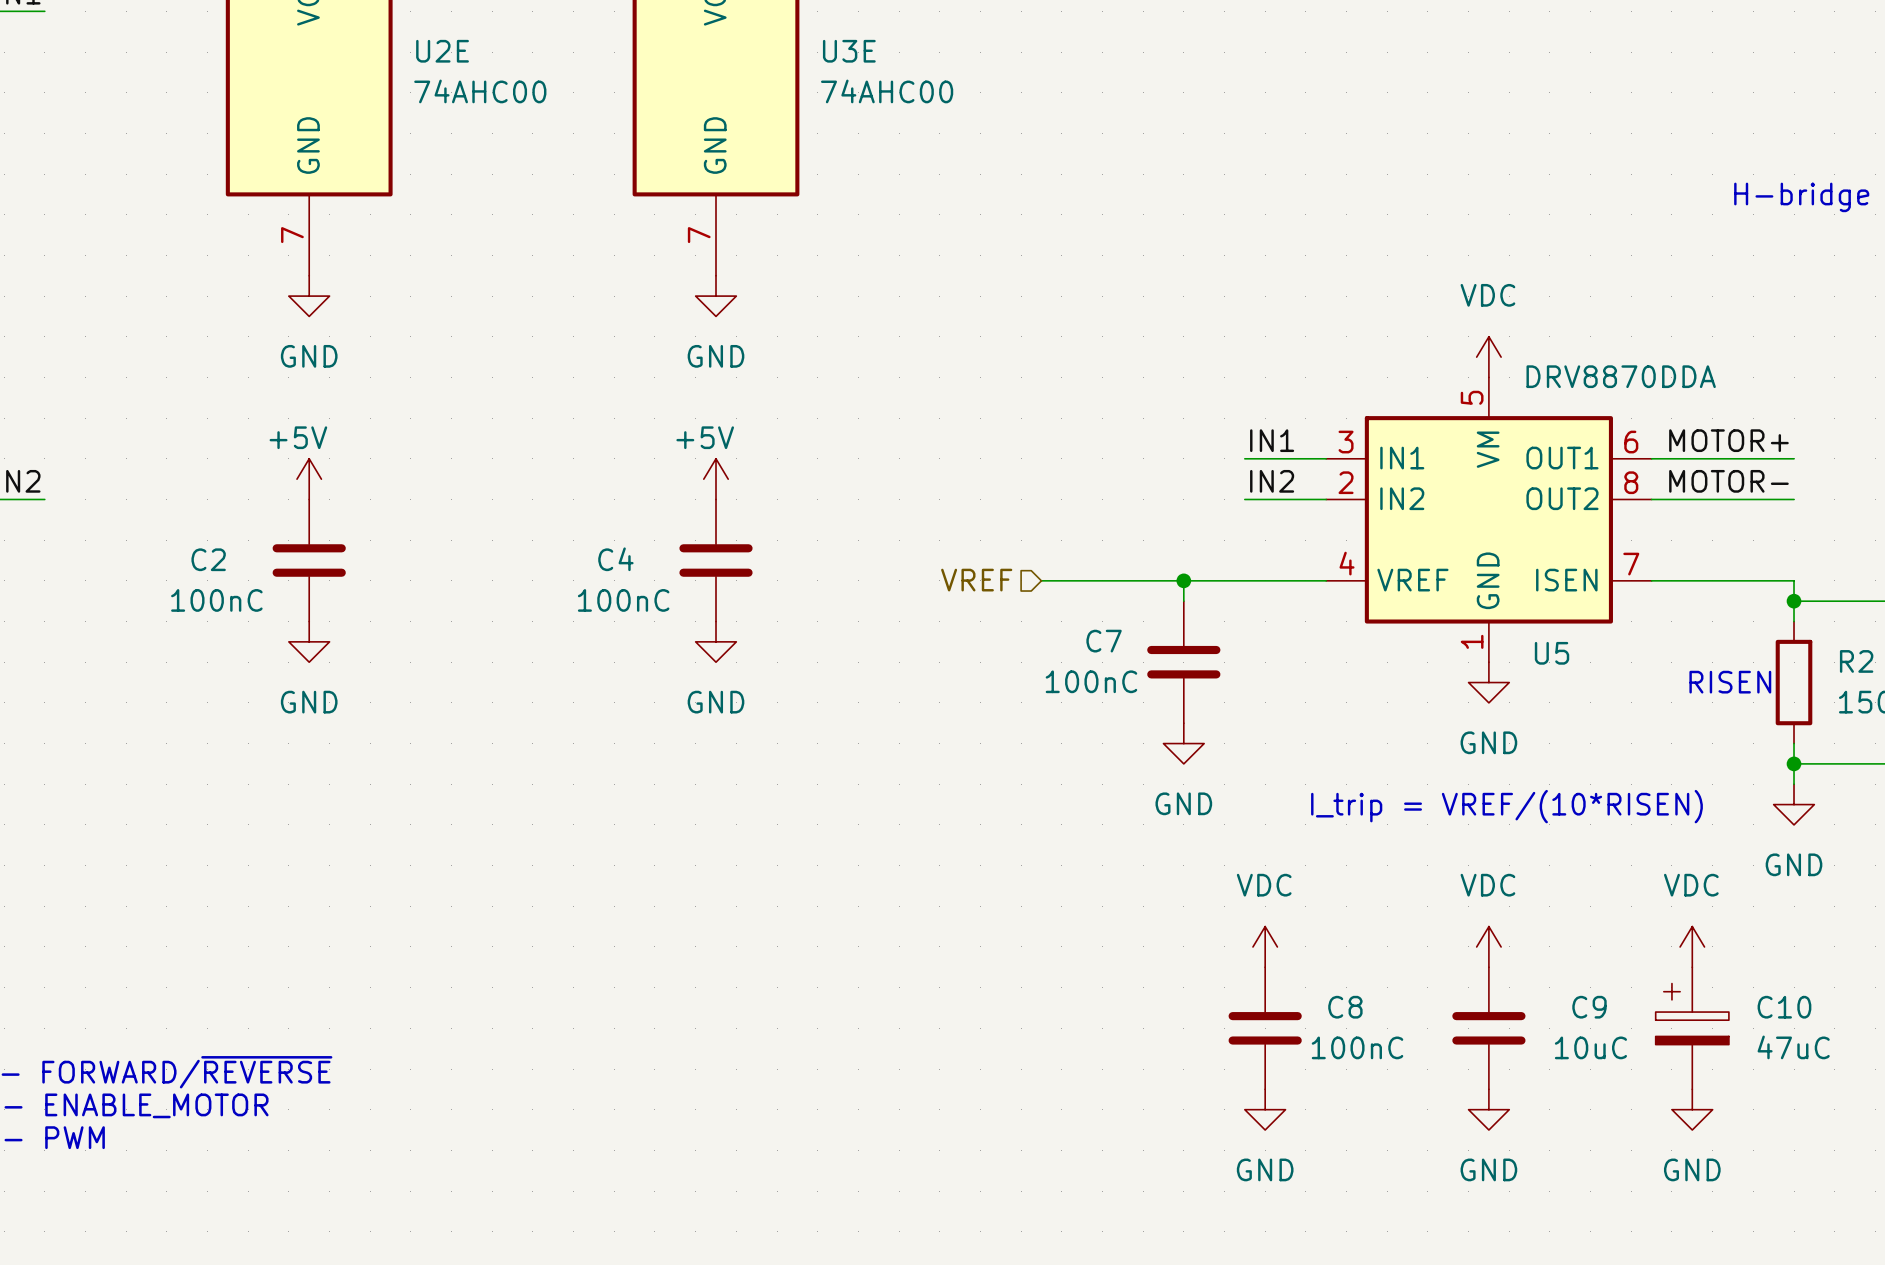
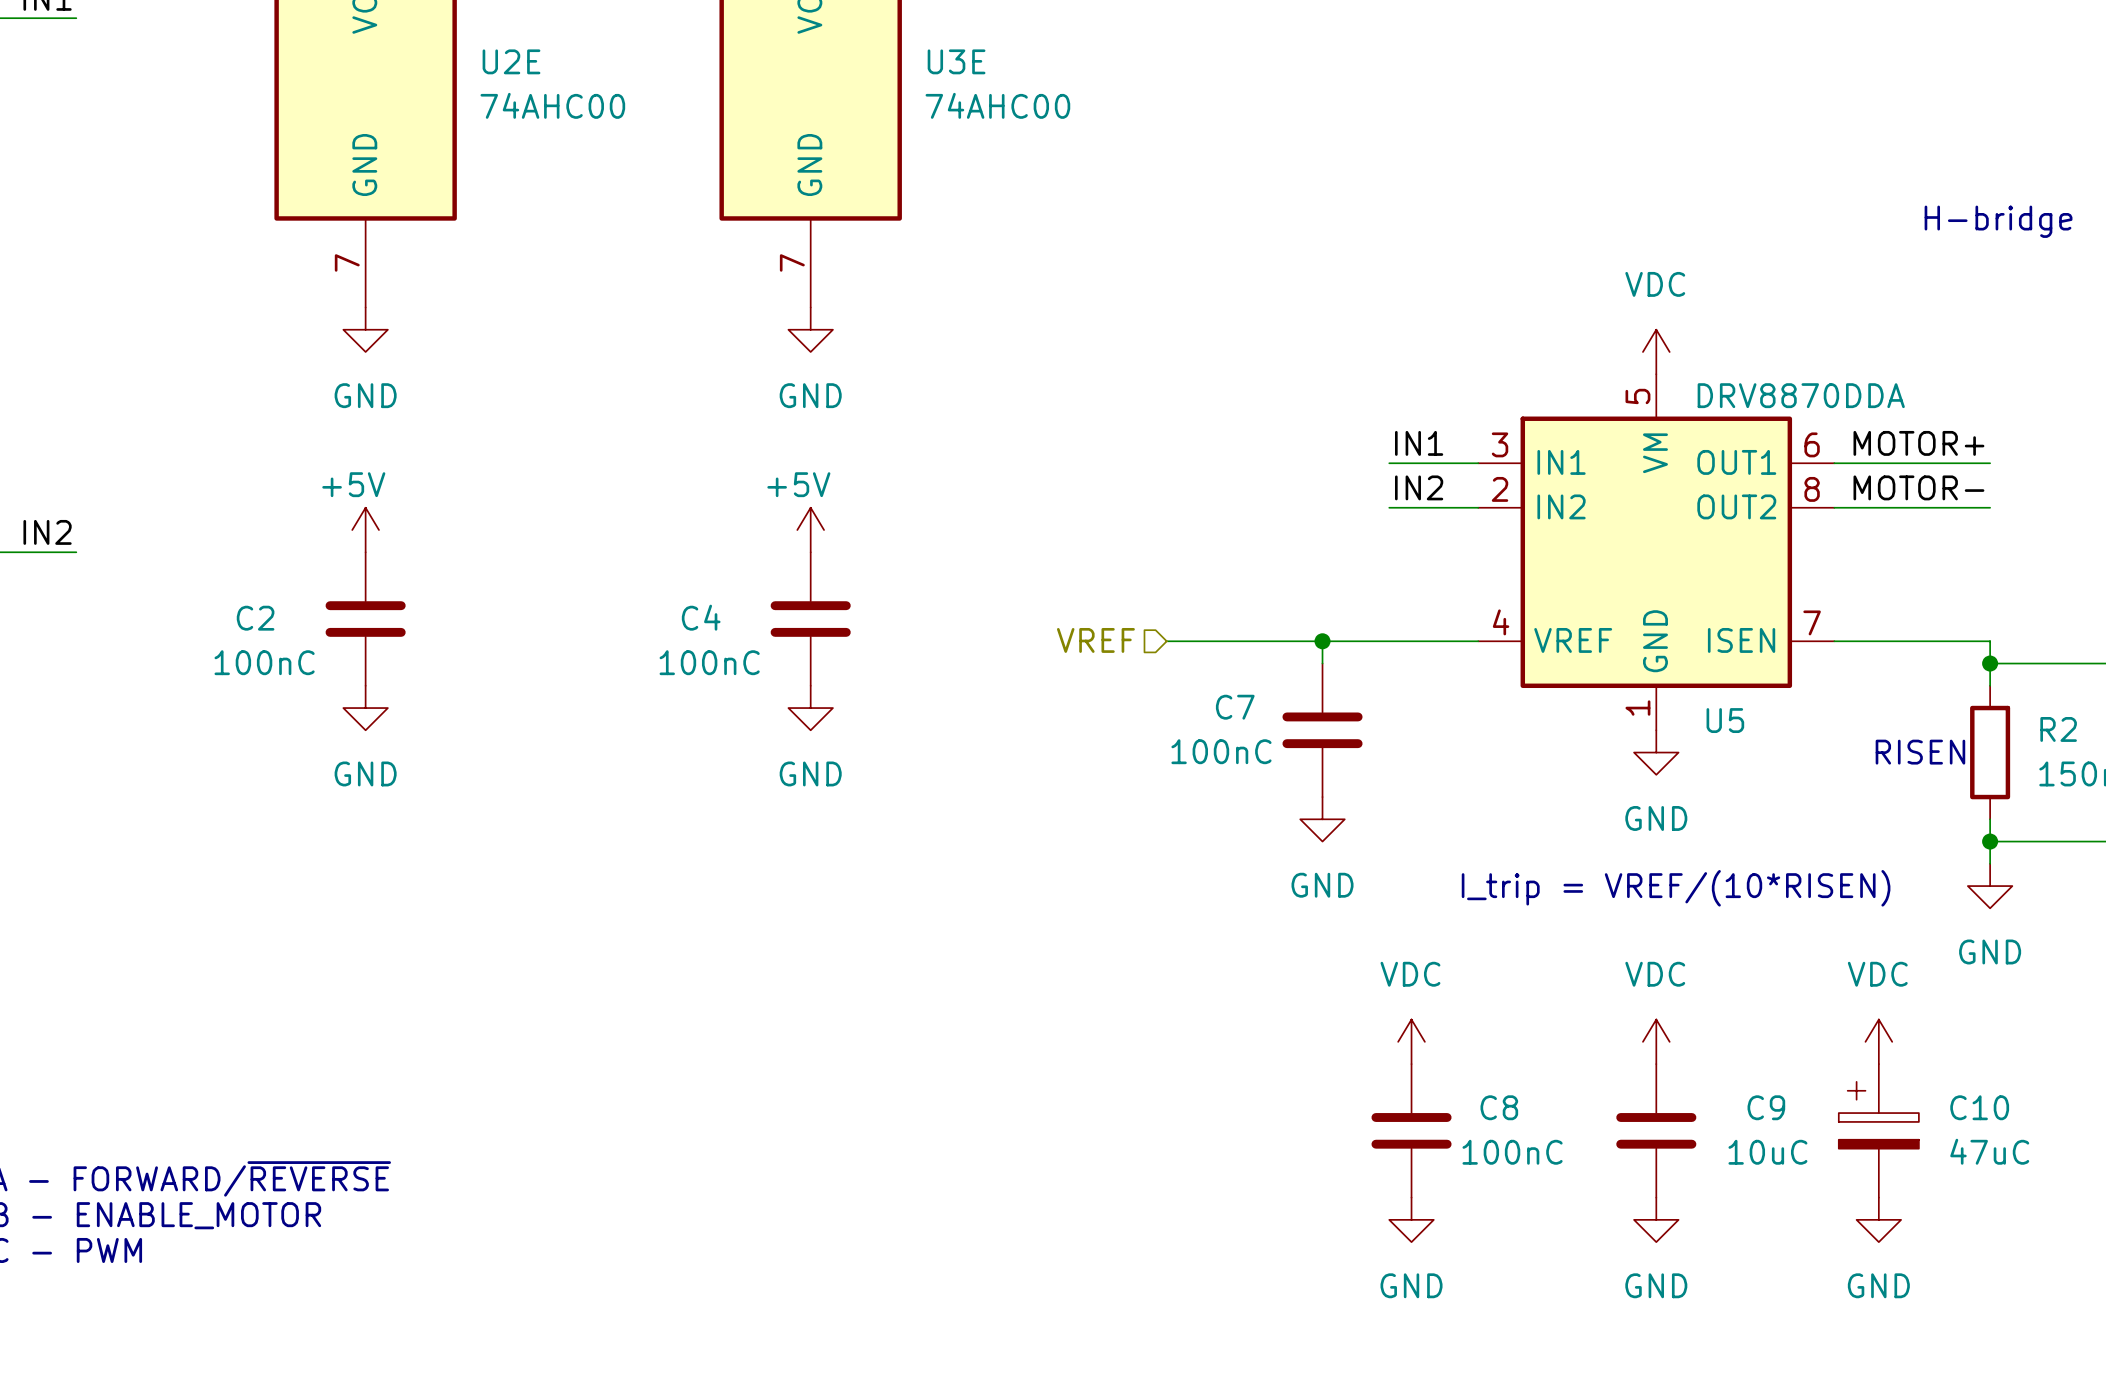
power symbol position: VDC (1488, 357) -> VDC (1656, 351)
U5 symbol: [1326, 377, 1652, 663] -> [1478, 374, 1835, 731]
label: none -> IN1 (1419, 443)
label: none -> MOTOR+ (1918, 443)
label: IN1 (1272, 440) -> IN2 (1419, 487)
label: MOTOR+ (1728, 440) -> MOTOR- (1918, 487)
label: IN2 (1272, 481) -> none
label: MOTOR- (1728, 481) -> none
wire: (1244, 499) (1326, 499) -> (1389, 463) (1478, 463)
wire: (1651, 499) (1794, 499) -> (1834, 463) (1990, 463)

